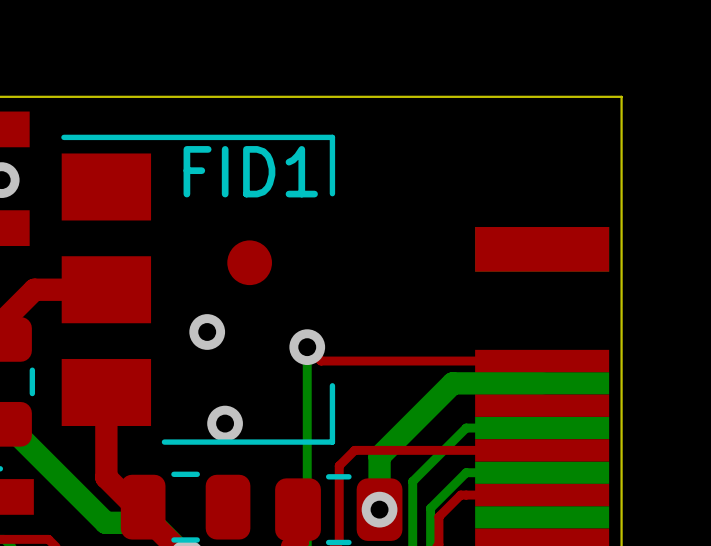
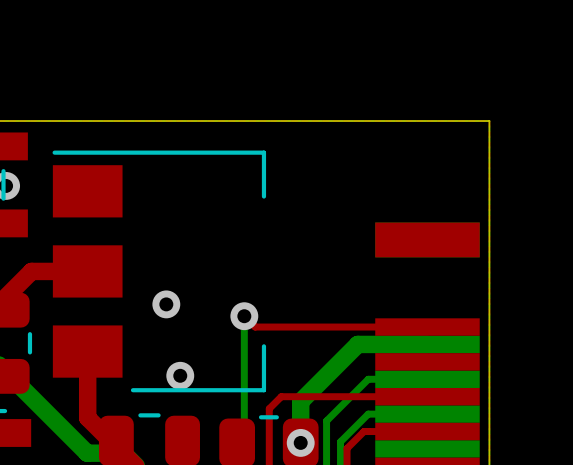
FID1: (249, 262) -> none

